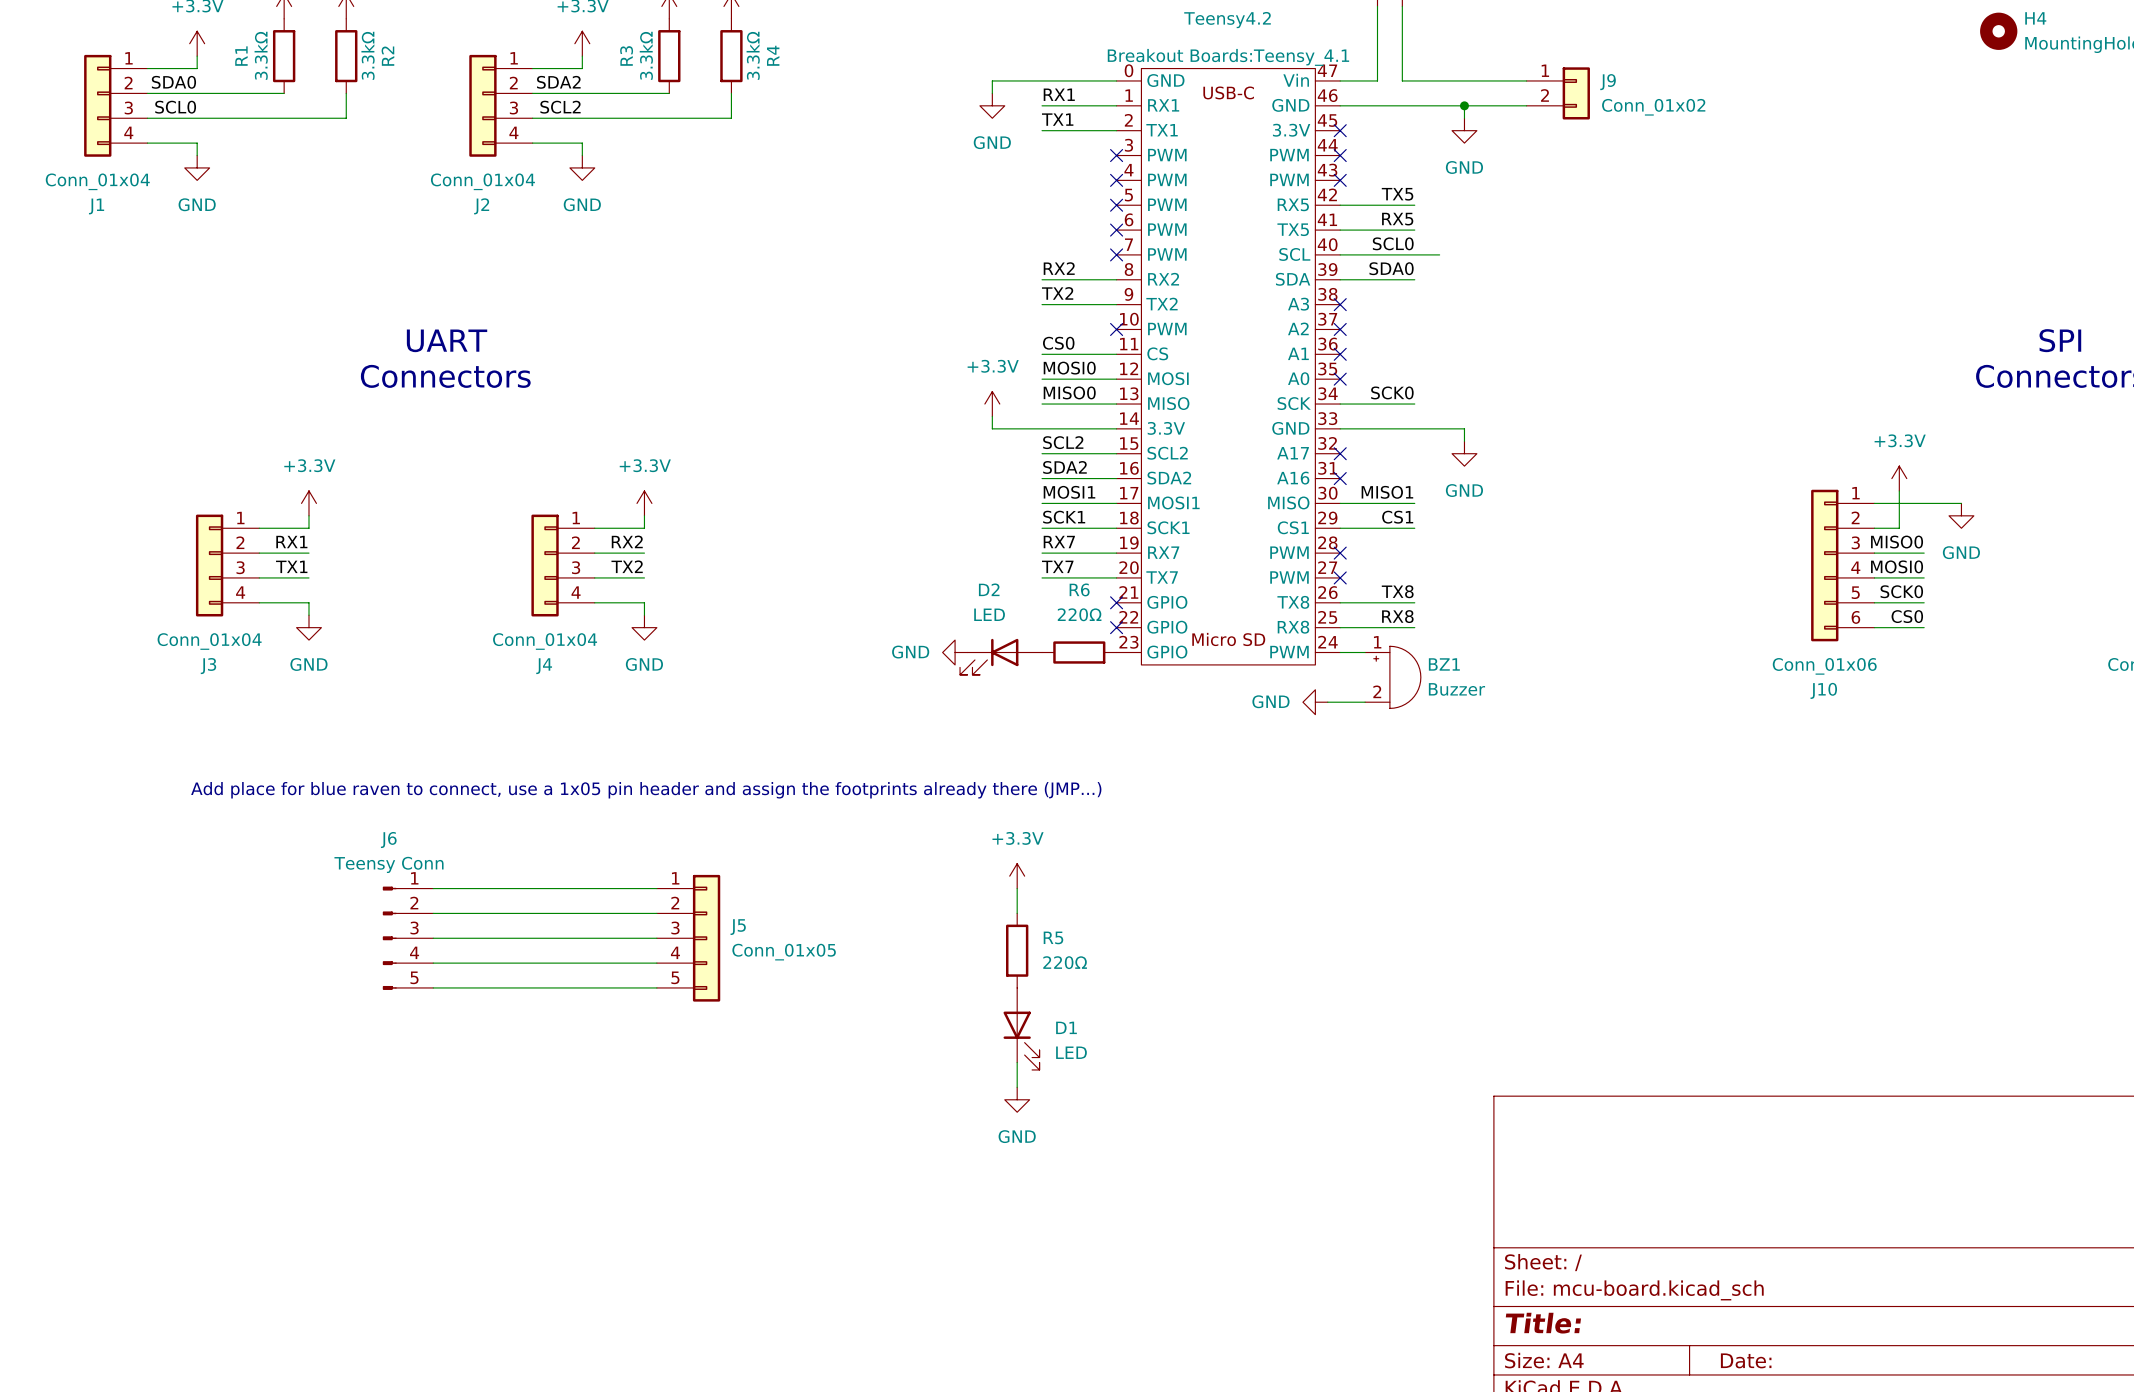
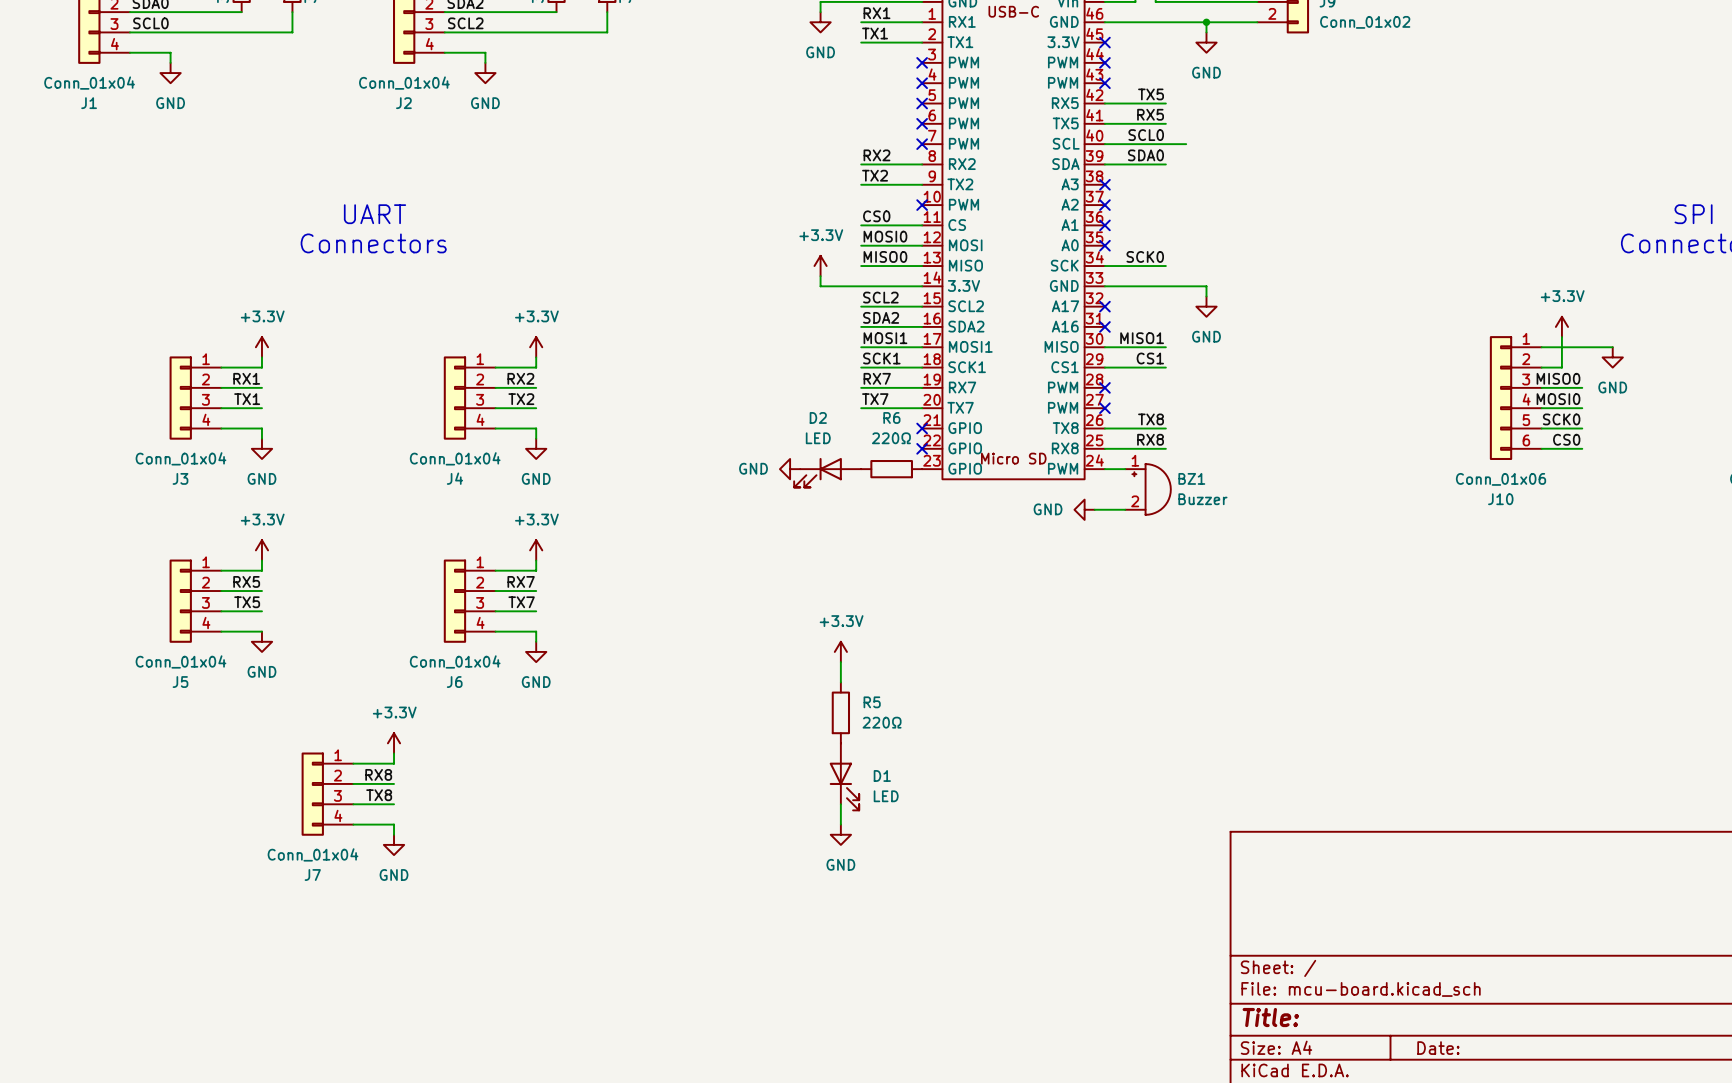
power symbol: none -> +3.3V (261, 550)
power symbol: none -> +3.3V (536, 550)
wire: none -> (261, 560) (261, 570) (221, 570)
wire: none -> (536, 560) (536, 570) (495, 570)
label: none -> RX5 (246, 581)
label: none -> RX7 (521, 581)
text: Add place for blue raven to connect, use a 1x05 pin header and assign the footprints already there (JMP...) (646, 790) -> none
wire: none -> (221, 591) (261, 591)
wire: none -> (495, 591) (536, 591)
label: none -> TX5 (247, 602)
label: none -> TX7 (521, 602)
wire: none -> (221, 611) (261, 611)
wire: none -> (495, 611) (536, 611)
J6 name position: J6 (388, 840) -> J6 (454, 682)
wire: none -> (221, 631) (261, 631)
wire: none -> (495, 631) (536, 631) (536, 641)
power symbol: none -> GND (261, 641)
J6 value: Teensy Conn (389, 864) -> Conn_01x04 (455, 661)
J5 symbol: [656, 874, 721, 1002] -> [169, 559, 222, 643]
power symbol: none -> GND (536, 651)
J6 symbol: [382, 886, 434, 990] -> [443, 559, 496, 643]
wire: (433, 888) (656, 888) -> none
wire: (433, 913) (656, 913) -> none
J5 name position: J5 (738, 927) -> J5 (180, 682)
wire: (433, 938) (656, 938) -> none
J5 value: Conn_01x05 (784, 952) -> Conn_01x04 (180, 661)
wire: (433, 963) (656, 963) -> none
wire: (433, 987) (656, 987) -> none
power symbol: none -> +3.3V (394, 743)
wire: none -> (394, 753) (394, 763) (353, 763)
label: none -> RX8 (378, 774)
wire: none -> (353, 783) (394, 783)
J7: none -> Conn_01x04 (327, 794)
label: none -> TX8 (379, 795)
wire: none -> (353, 804) (394, 804)
wire: none -> (353, 824) (394, 824) (394, 834)
power symbol: none -> GND (394, 844)

